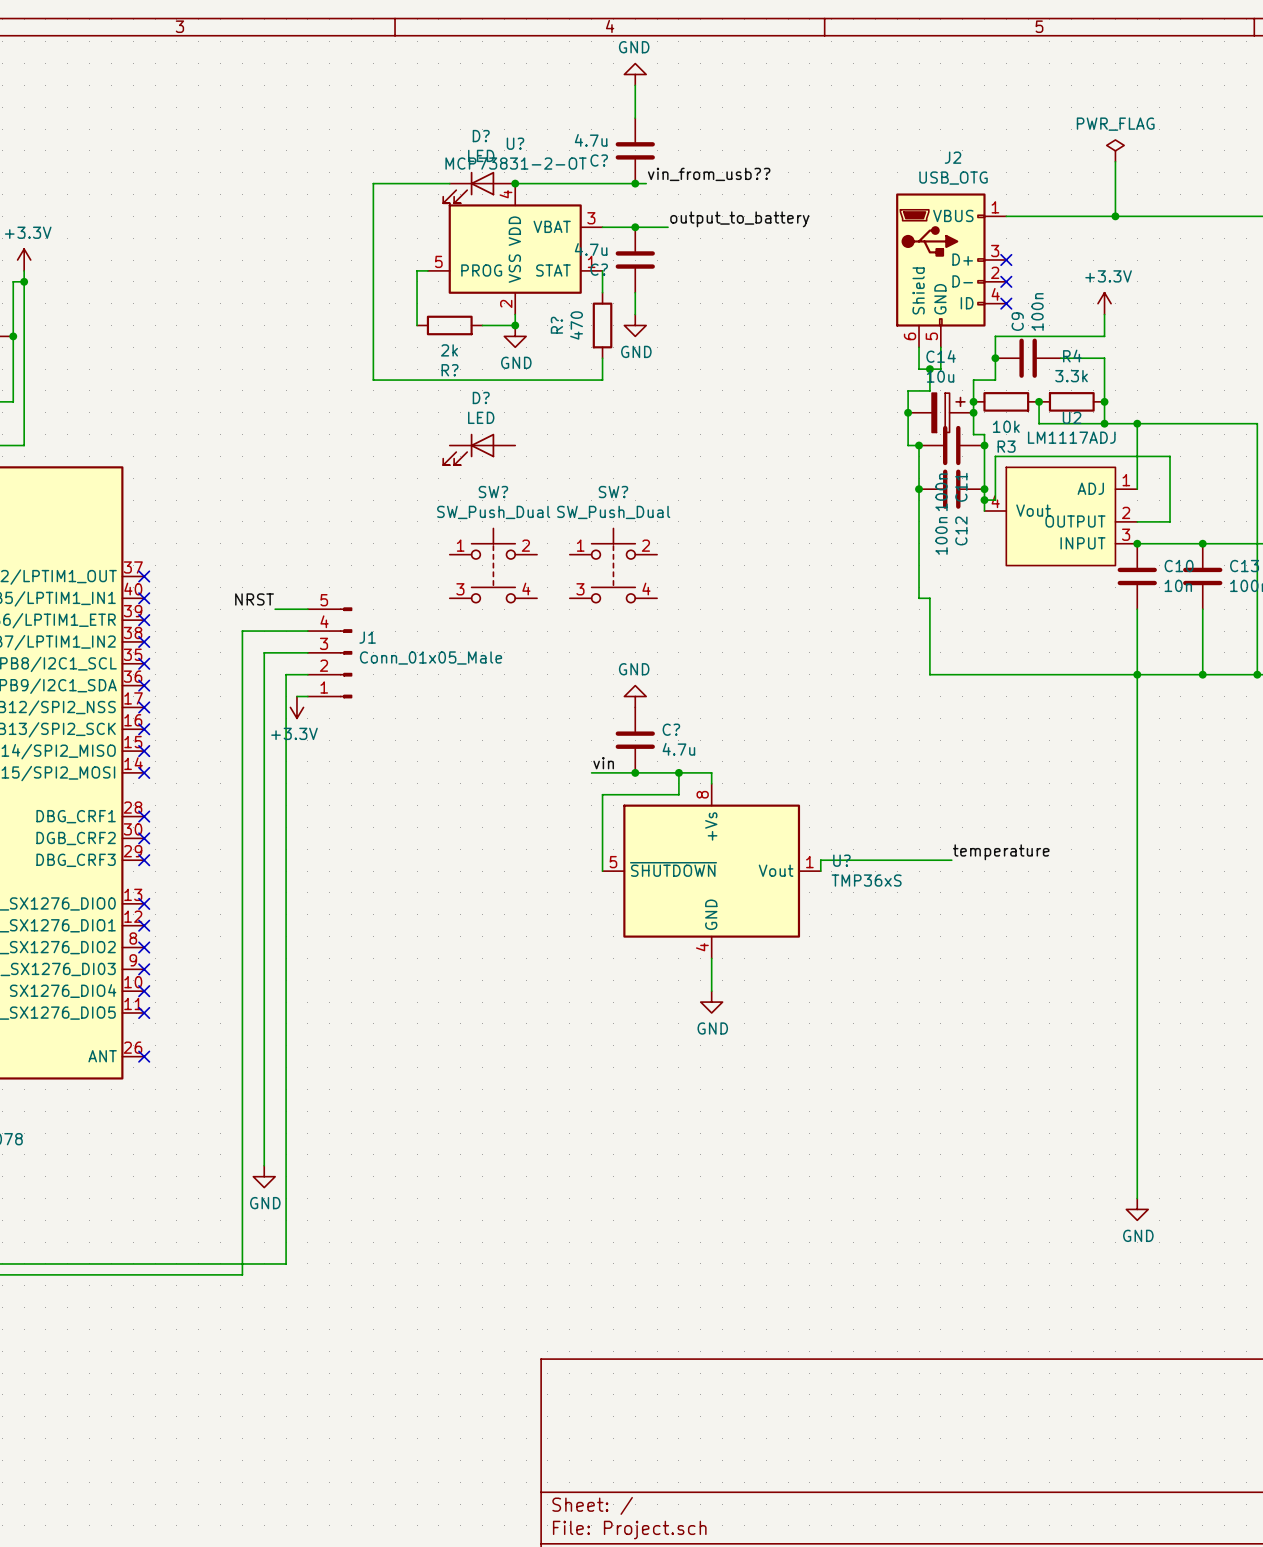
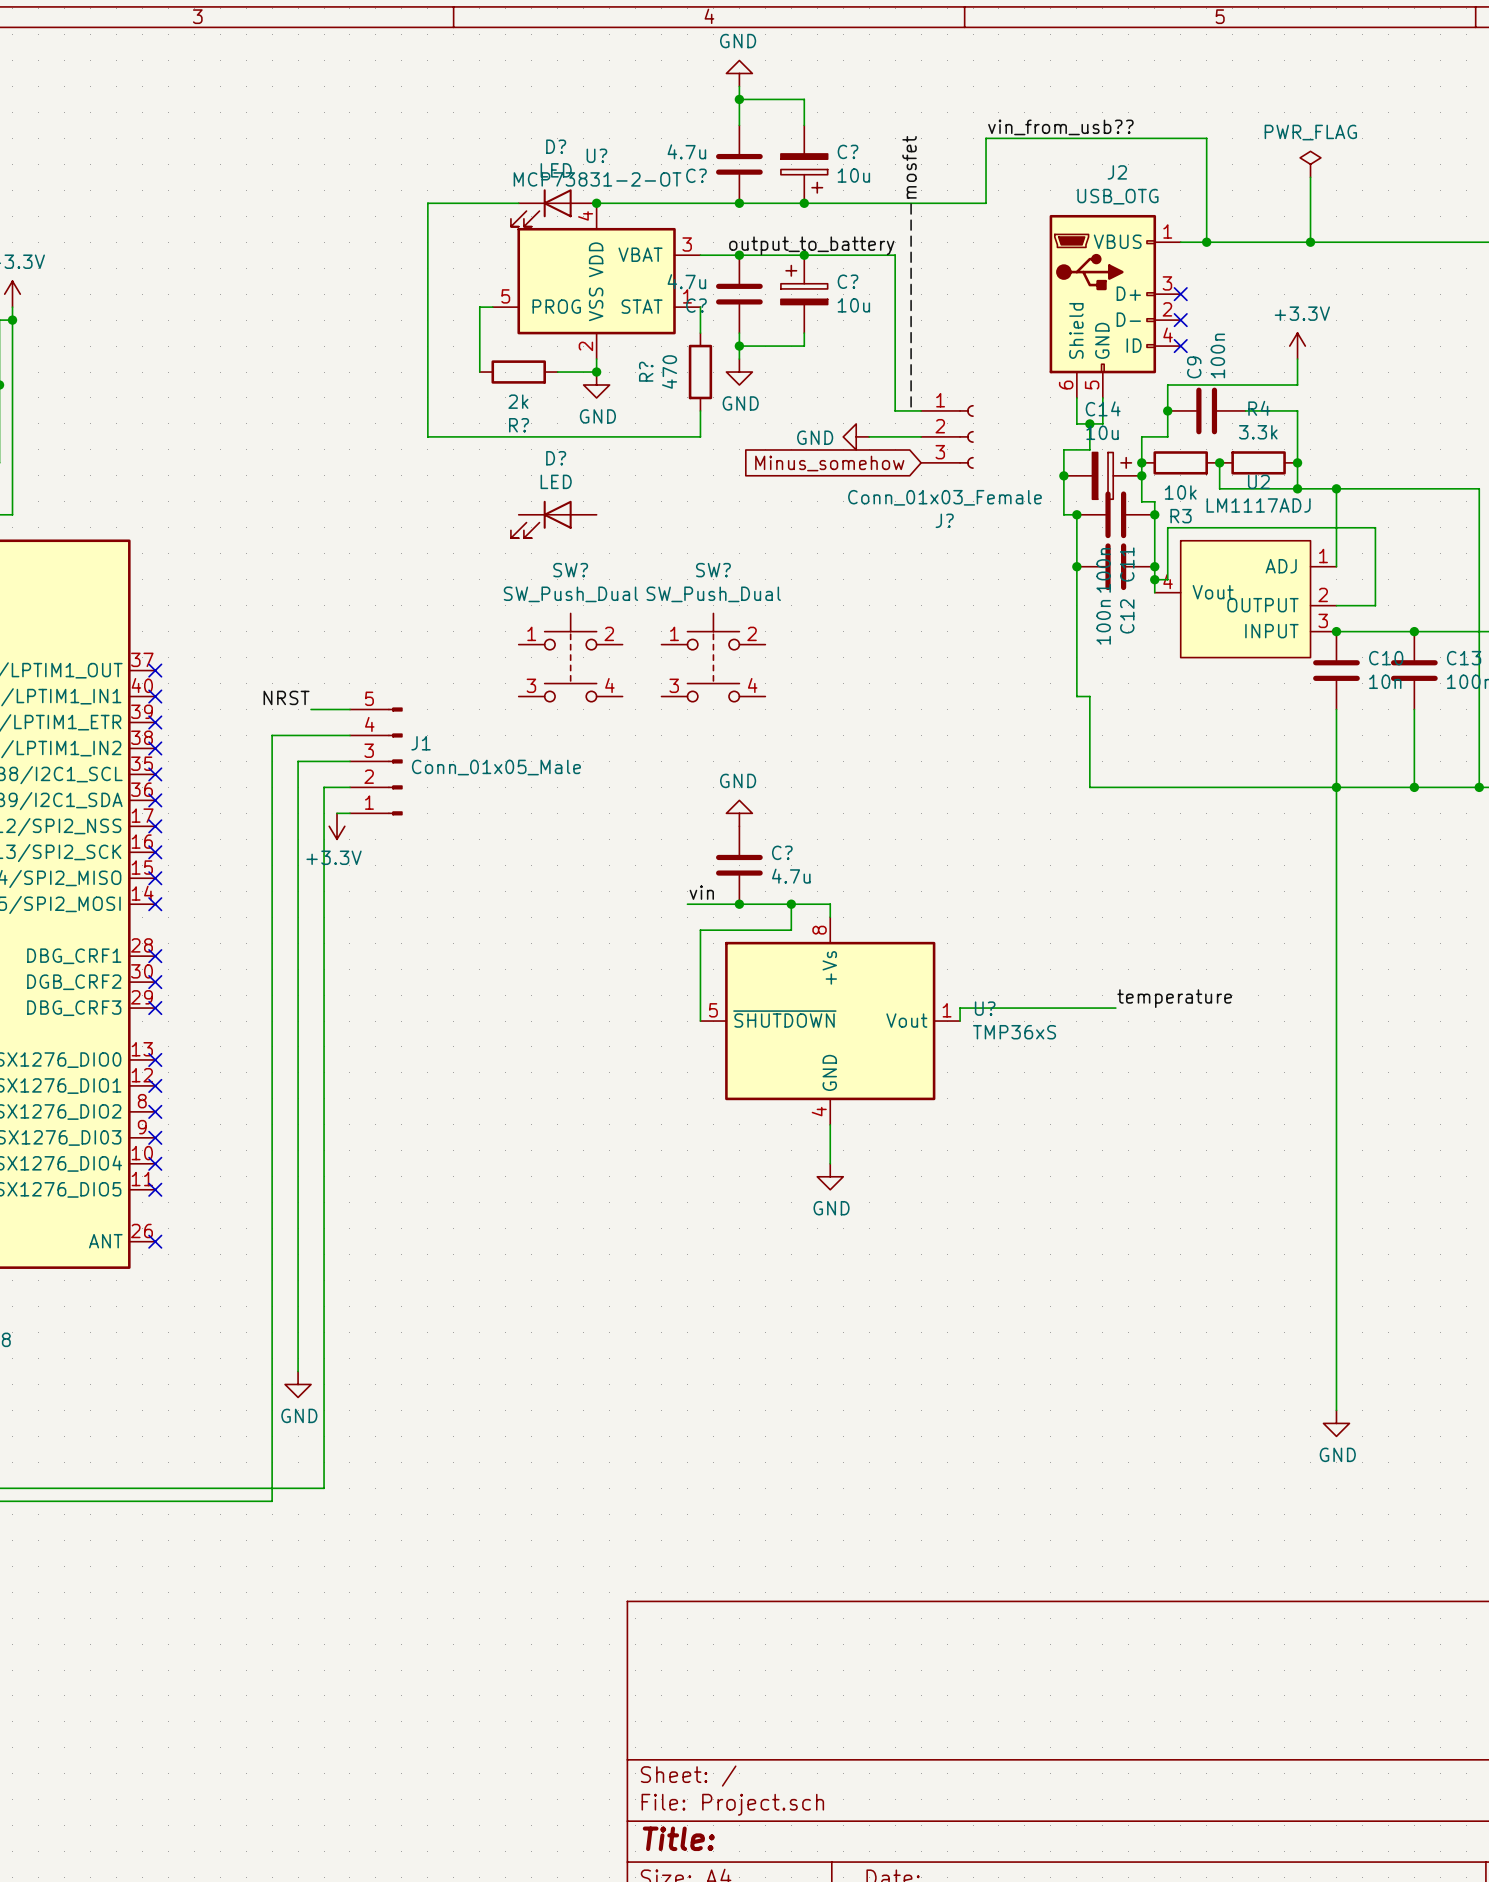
wire: none -> (739, 99) (804, 99) (804, 125)
junction: none -> (739, 99)
C?: none -> 10u (804, 164)
label position: vin_from_usb?? (709, 174) -> vin_from_usb?? (1060, 127)
wire: none -> (752, 203) (986, 203) (986, 138) (1206, 138) (1206, 242)
junction: none -> (804, 203)
junction: none -> (1206, 242)
label position: output_to_battery (739, 219) -> output_to_battery (811, 245)
wire: none -> (778, 255) (895, 255) (895, 410) (921, 410)
junction: none -> (804, 255)
label: none -> -------------mosfet (909, 271)
C?: none -> 10u (804, 294)
wire: none -> (804, 333) (804, 346) (739, 346)
junction: none -> (739, 346)
power symbol: none -> GND (856, 436)
wire: none -> (869, 436) (921, 436)
J?: none -> Conn_01x03_Female (947, 436)
global label: none -> Minus_somehow (829, 463)

